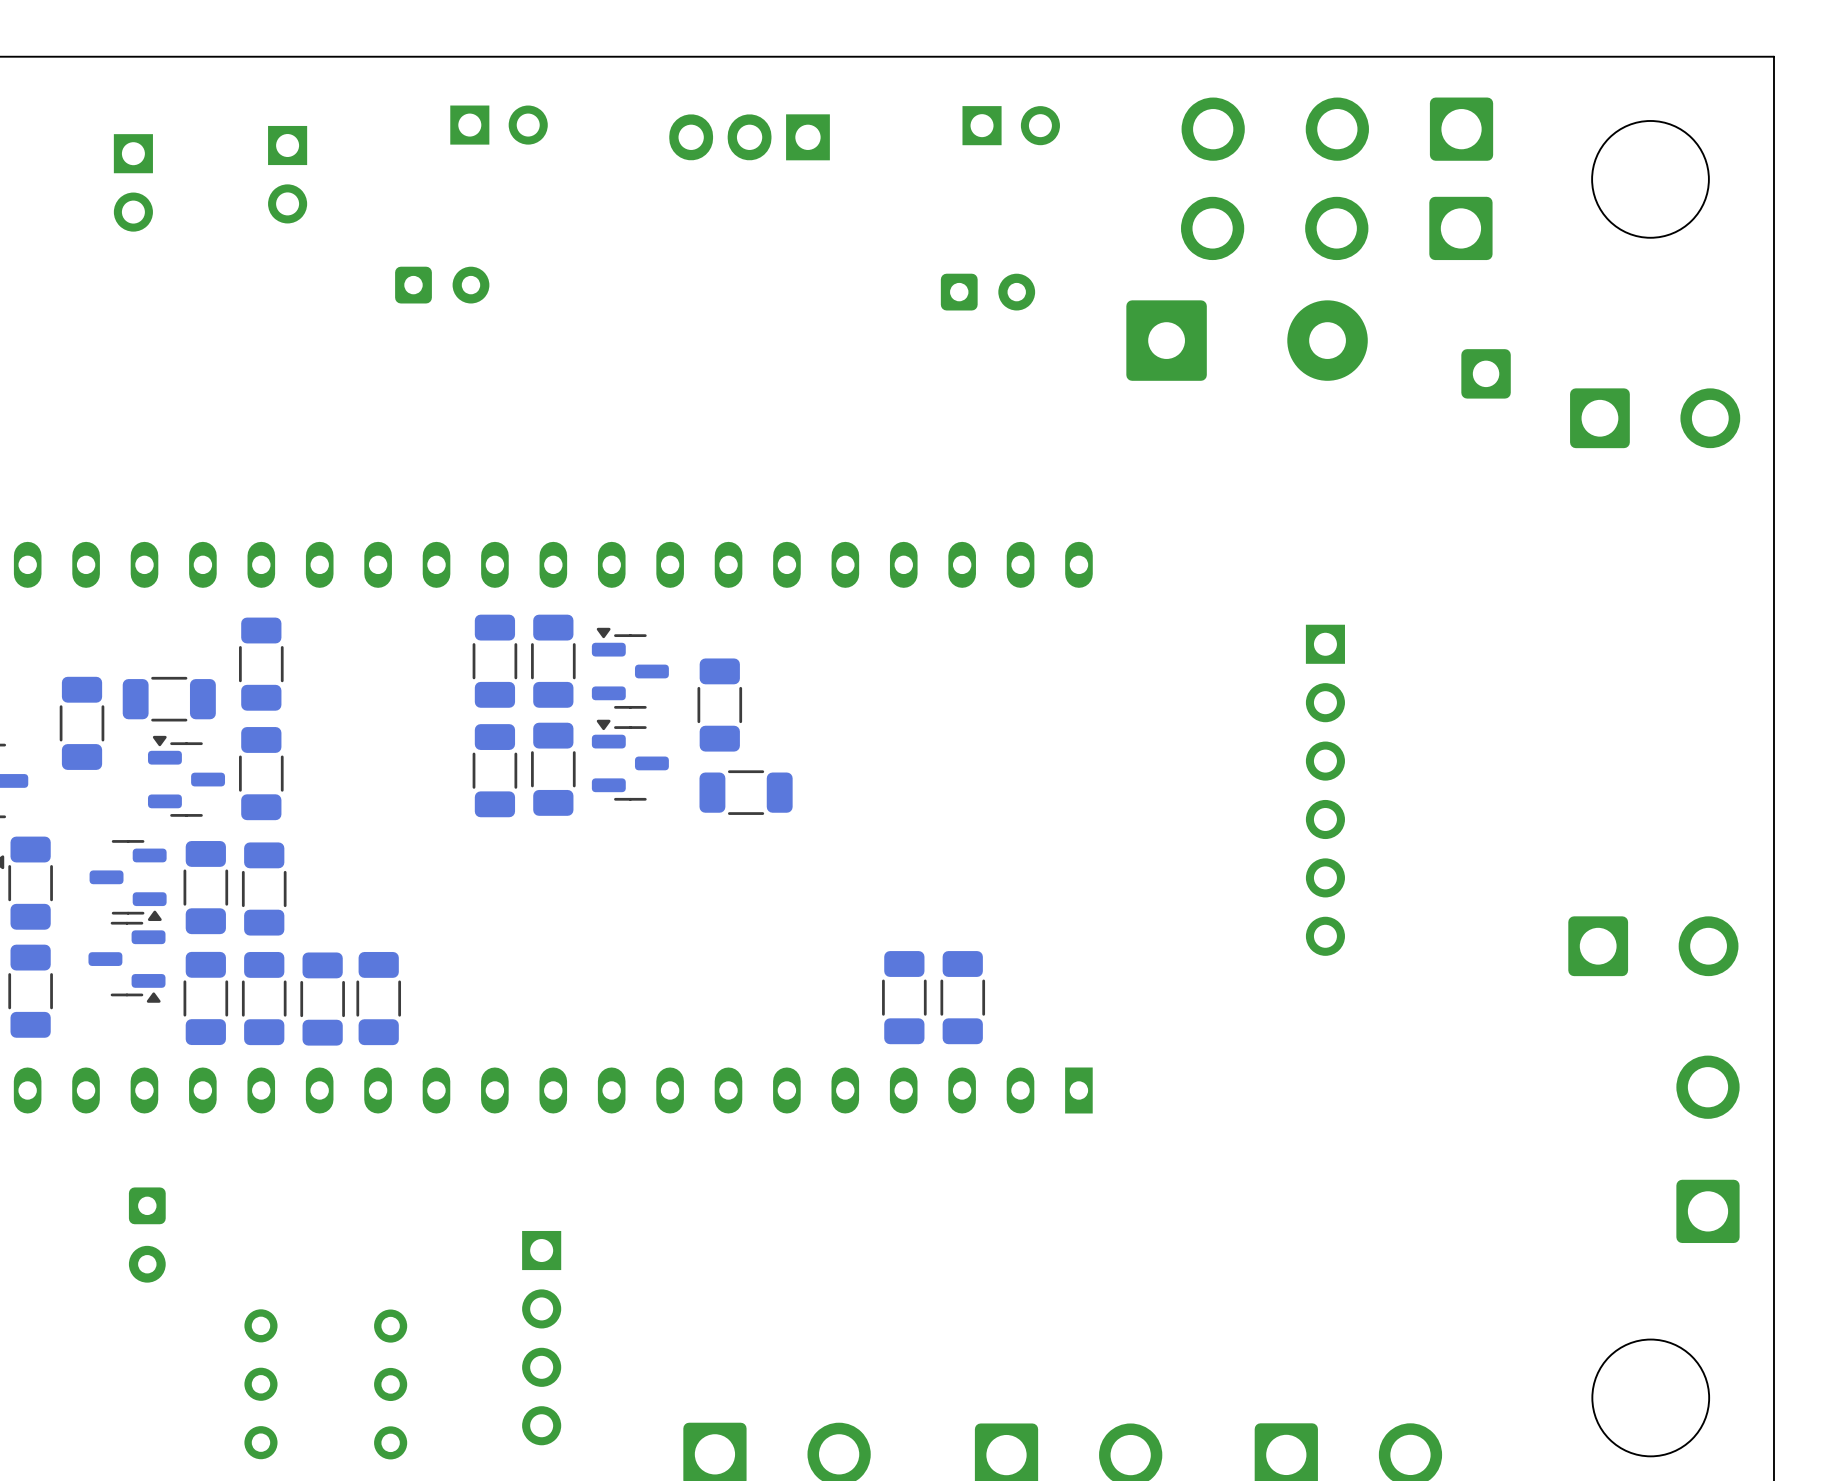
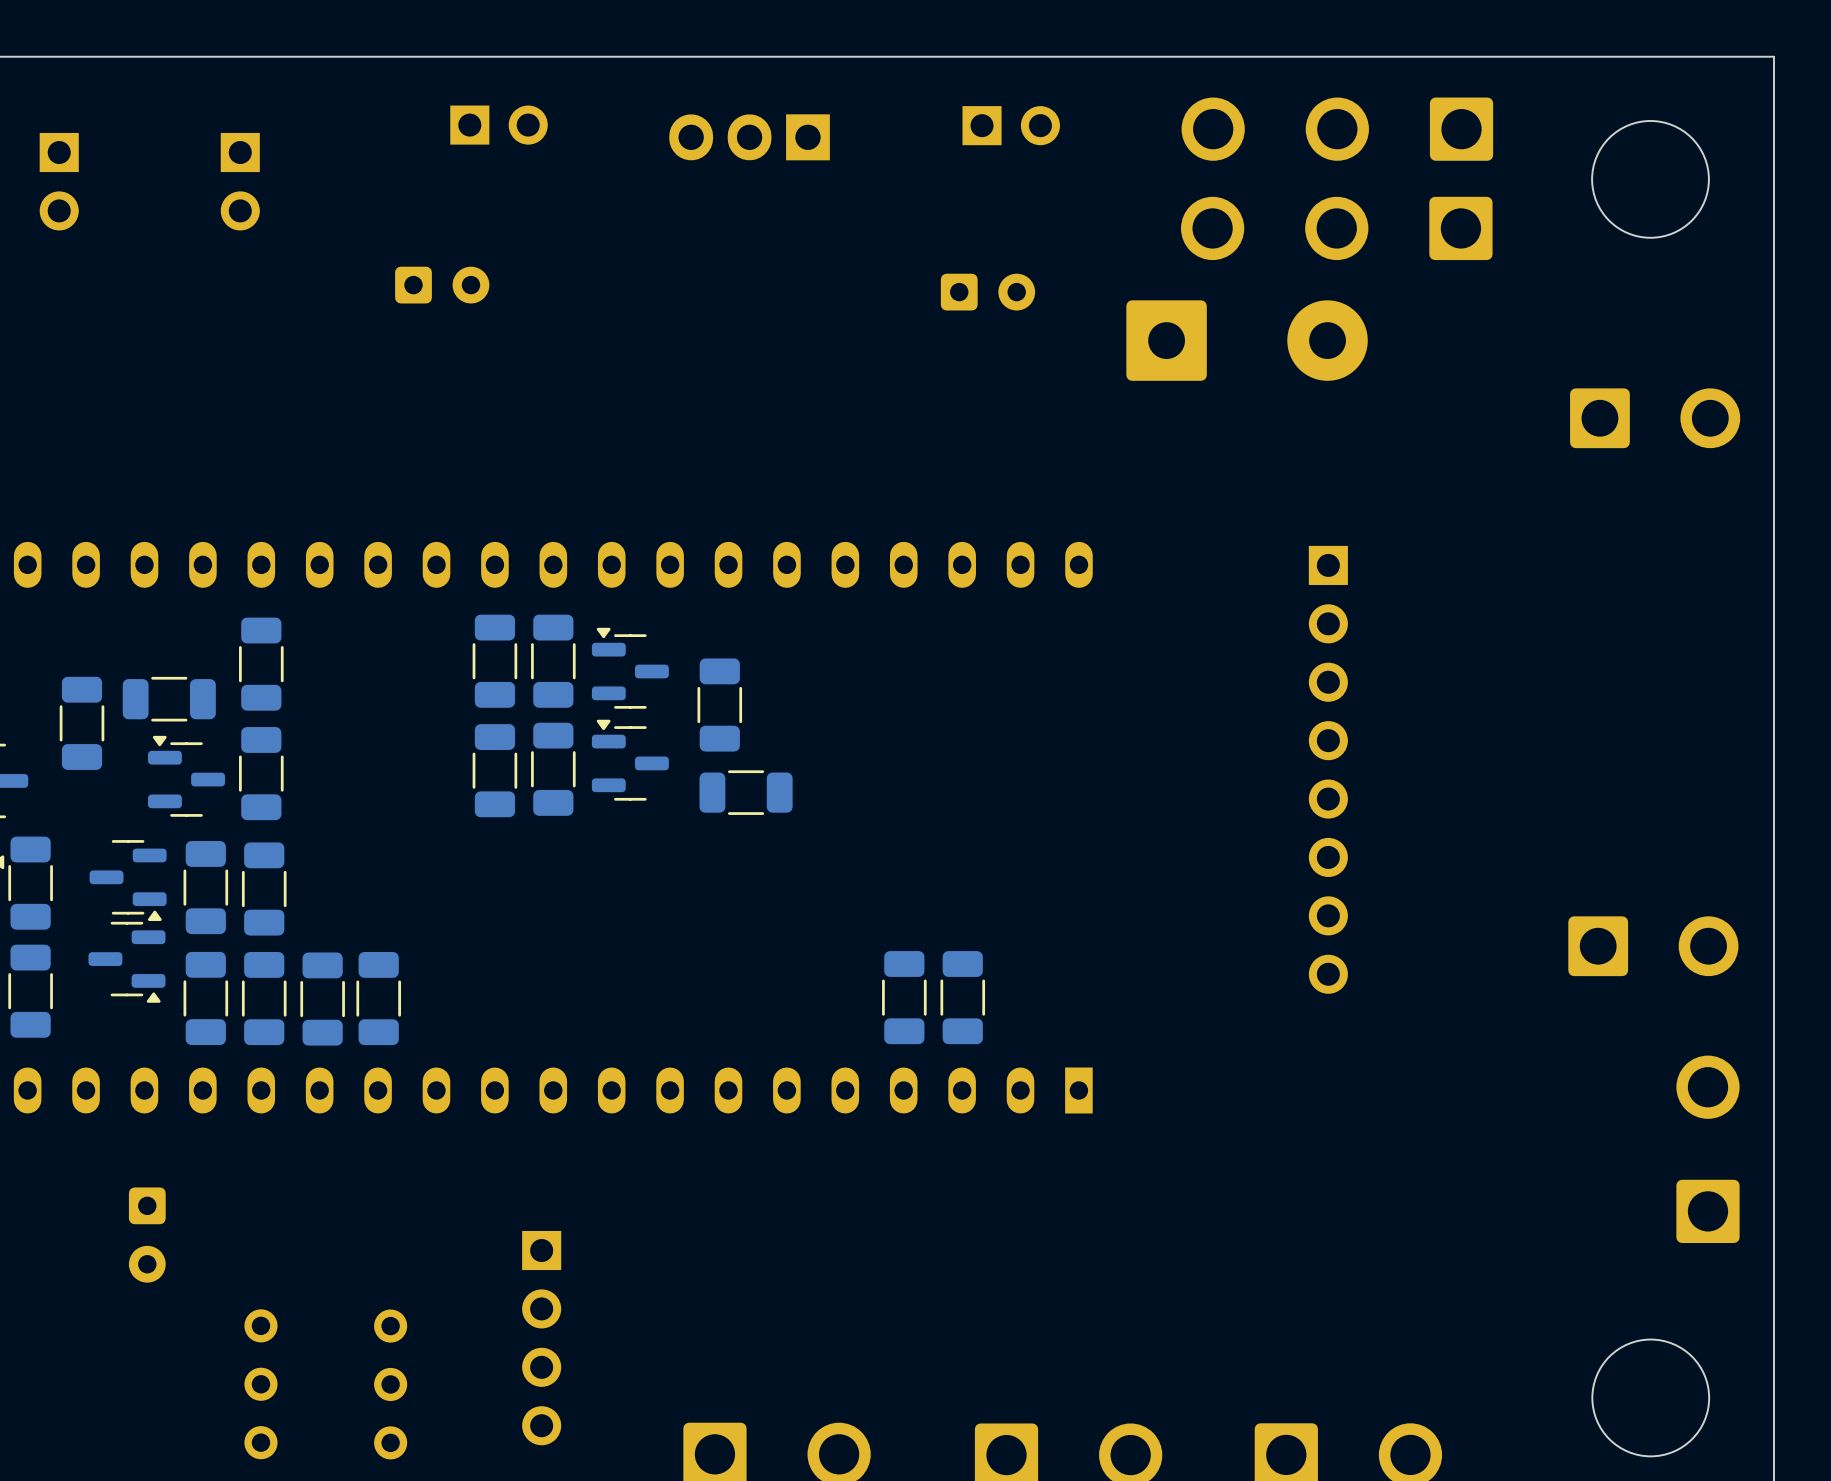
part position: (287, 174) -> (240, 181)
part: none -> (59, 181)
part: (133, 182) -> none
part: (1486, 373) -> none
part footprint: [1305, 624, 1345, 956] -> [1308, 545, 1348, 994]

